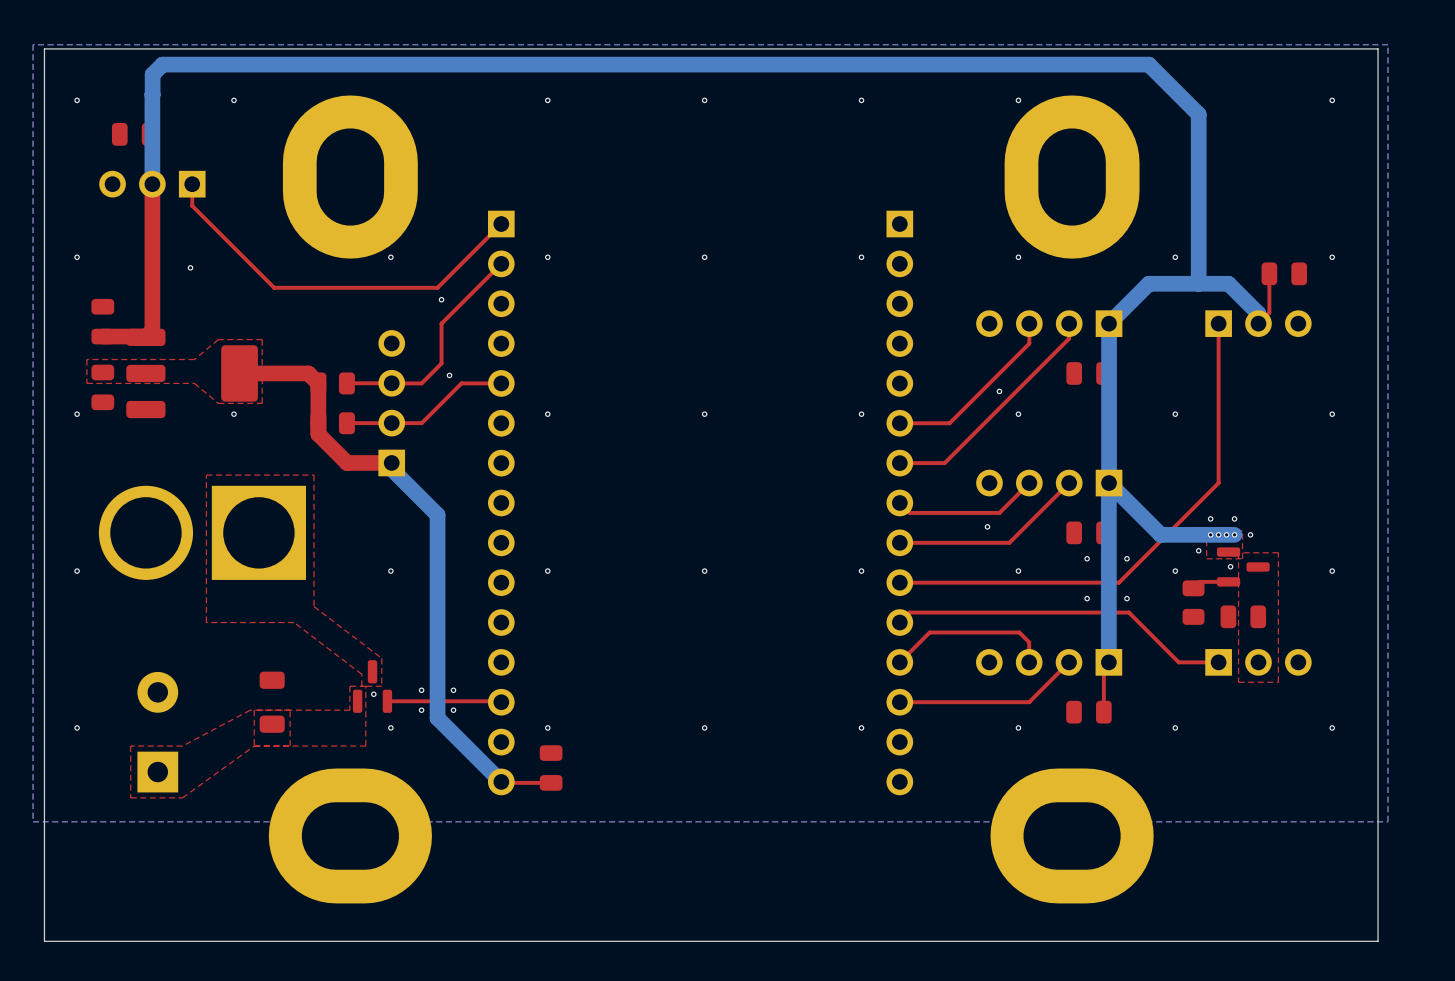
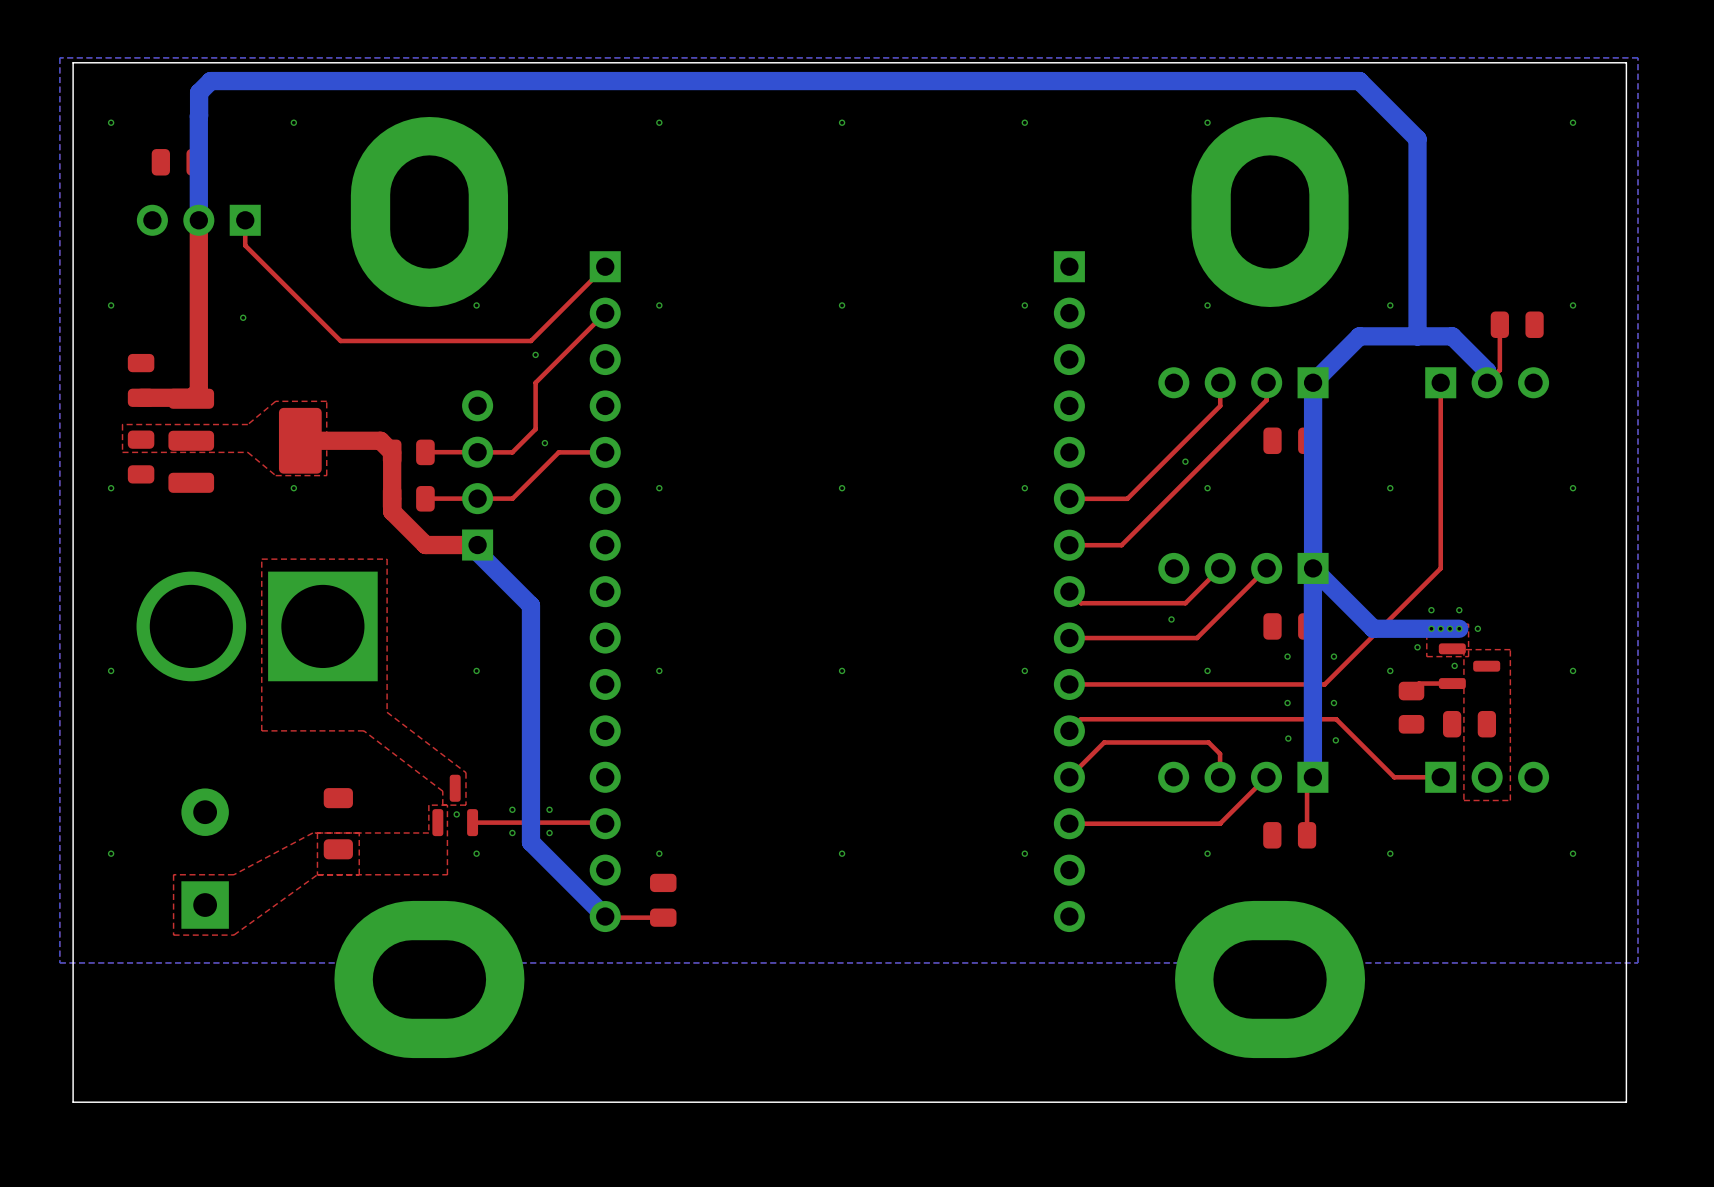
via: none -> (1288, 738)
via: none -> (1335, 740)

